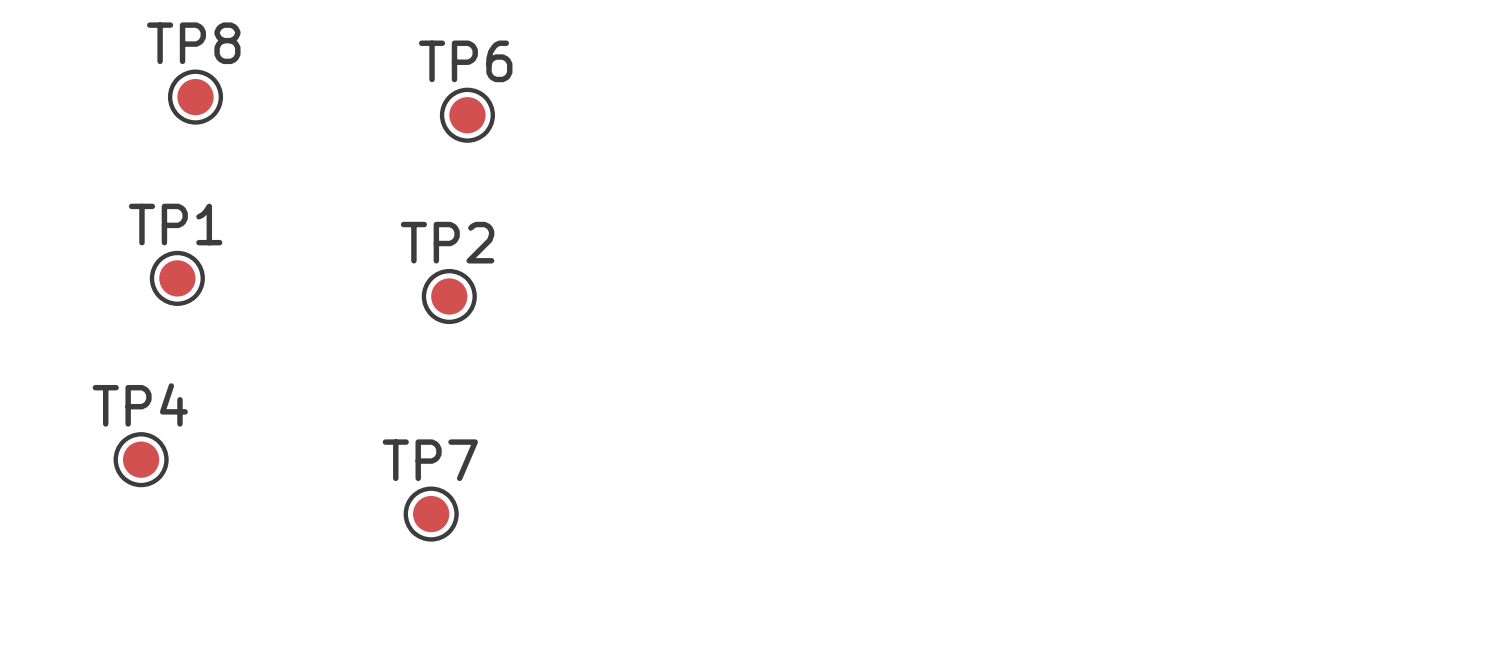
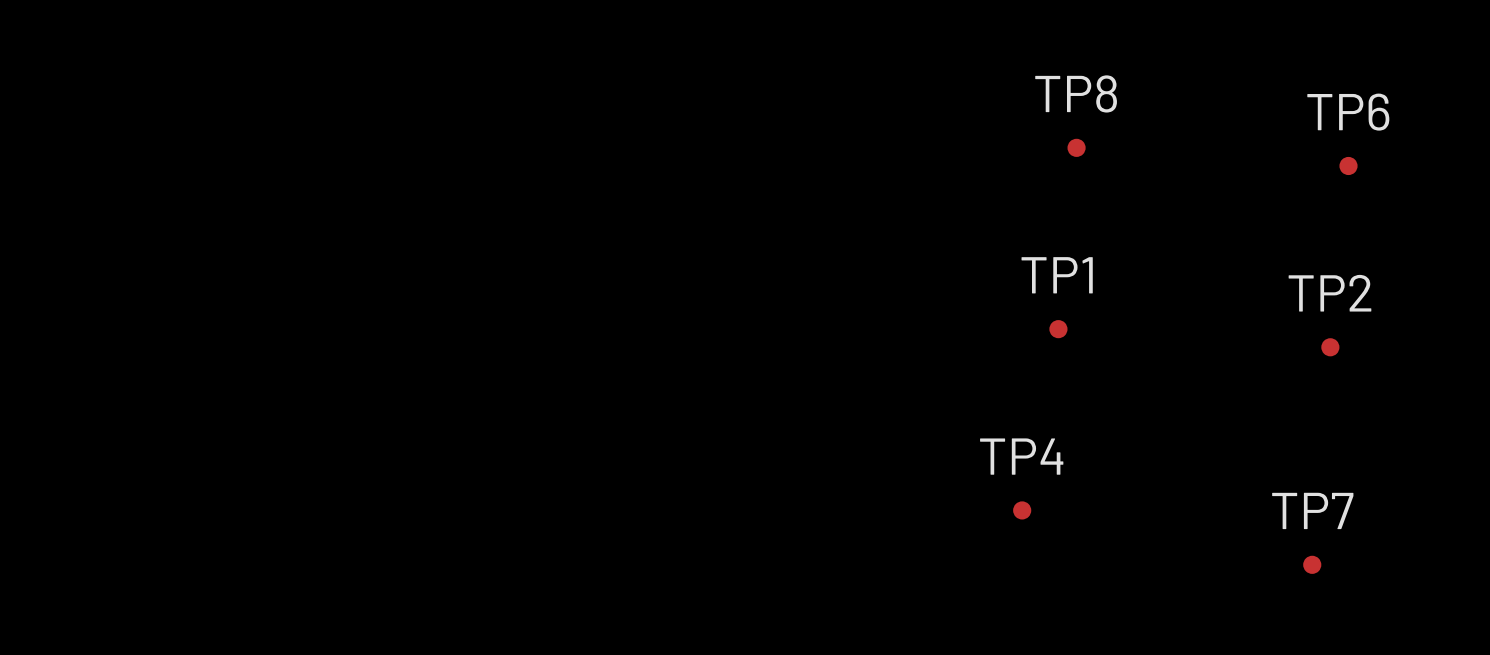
TP8 footprint: [167, 69, 224, 125] -> [1067, 138, 1086, 157]
TP6 footprint: [439, 87, 495, 143] -> [1339, 156, 1358, 176]
TP1 footprint: [149, 250, 205, 306] -> [1049, 320, 1068, 339]
TP2 footprint: [421, 268, 477, 325] -> [1321, 338, 1340, 357]
TP4 footprint: [113, 432, 169, 488] -> [1013, 501, 1032, 520]
TP7 footprint: [403, 486, 459, 542] -> [1303, 555, 1322, 574]

